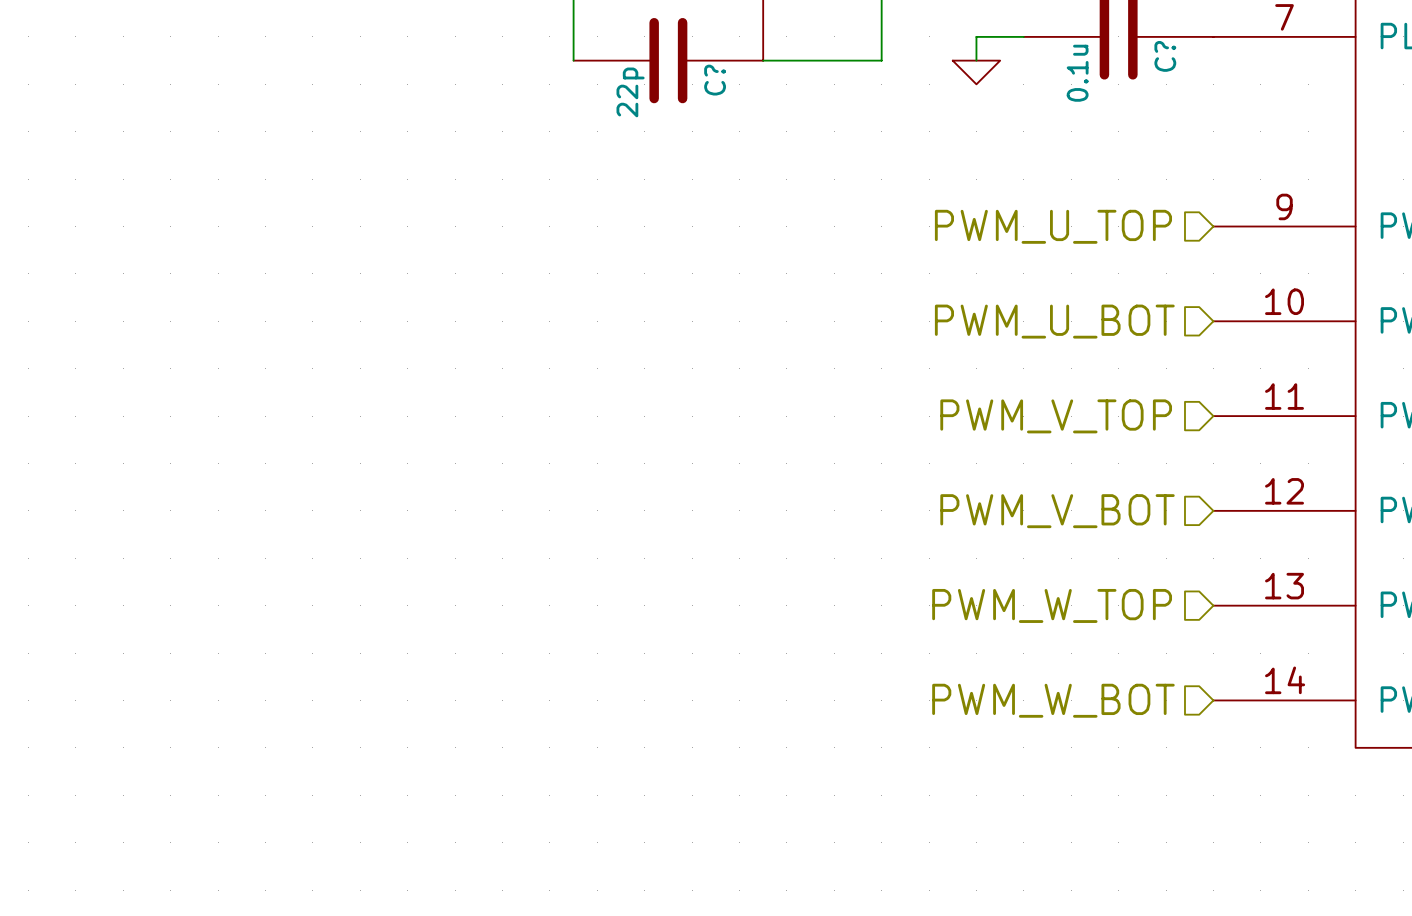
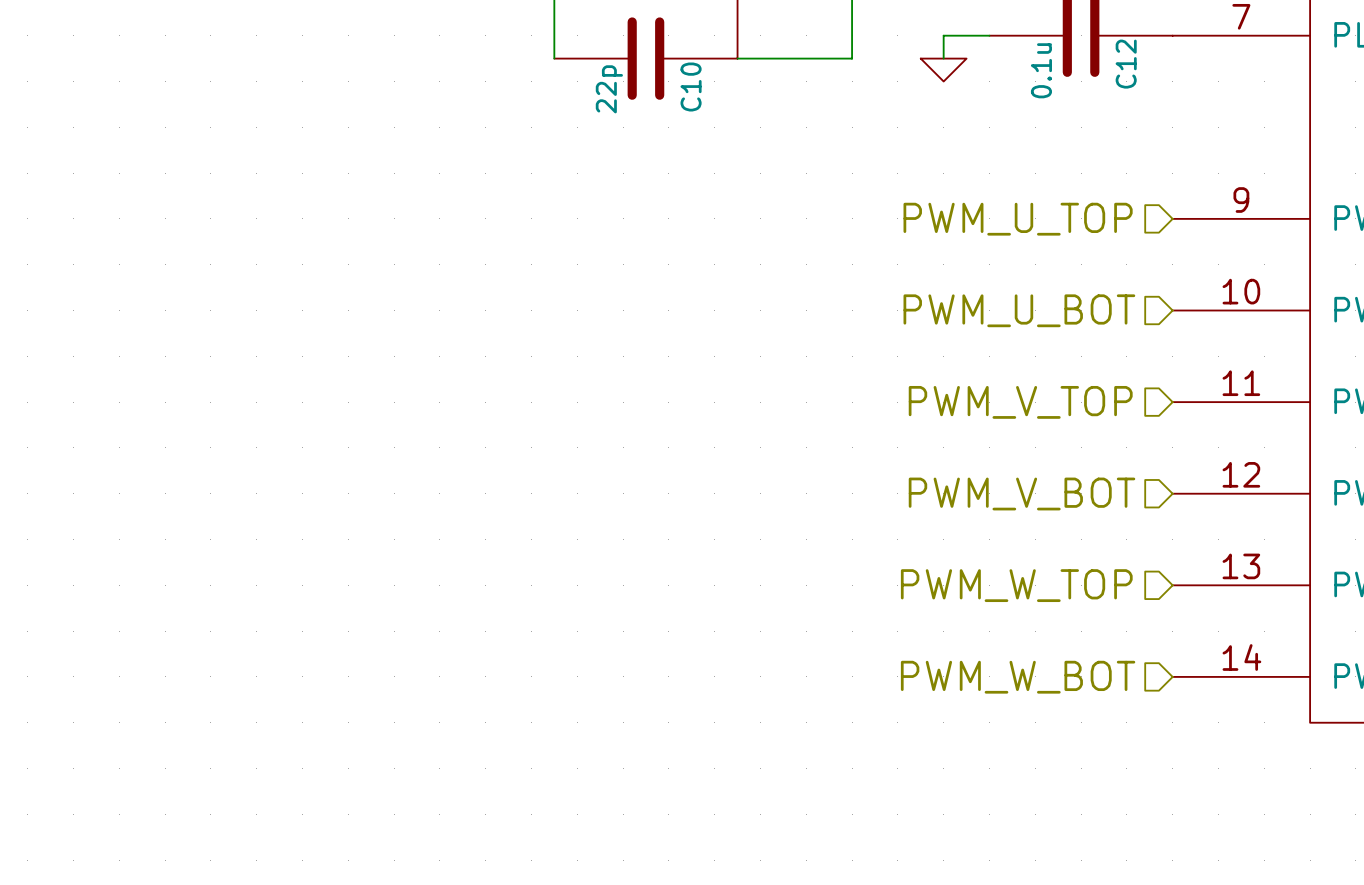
C? name: C? (1165, 56) -> C12 (1126, 64)
C? name: C? (715, 80) -> C10 (691, 87)

